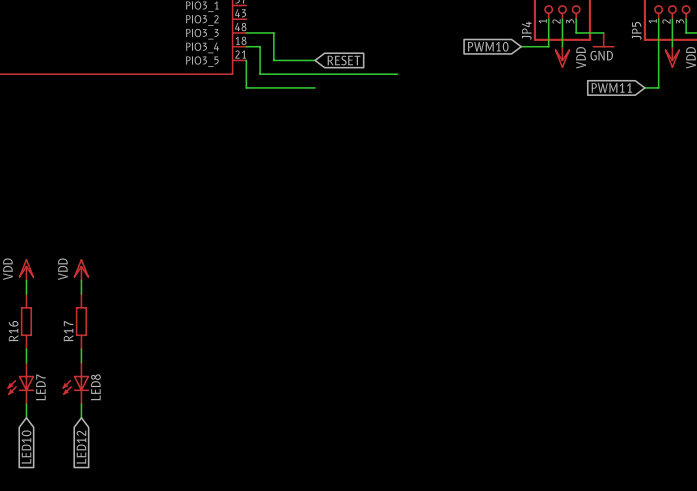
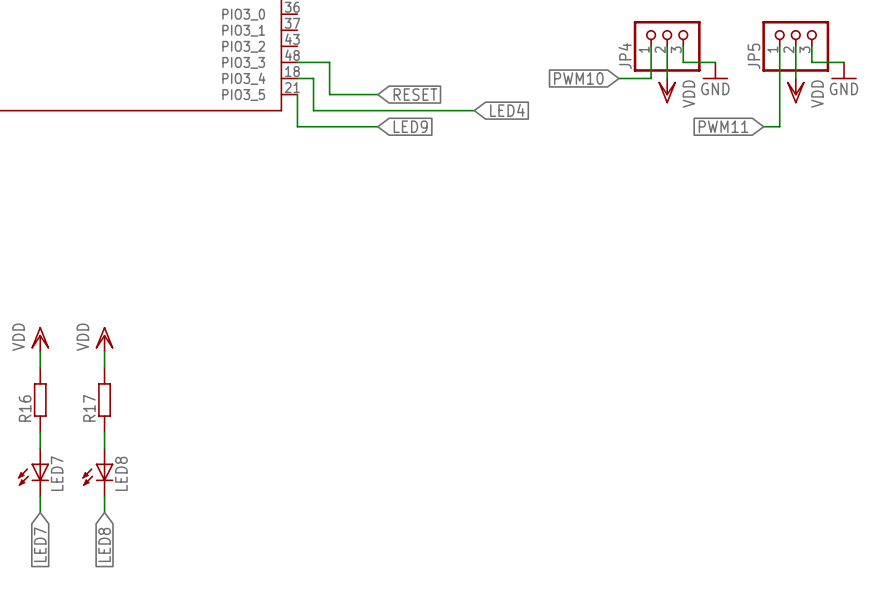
global label: none -> LED4 (507, 110)
global label: none -> LED9 (410, 126)
global label: LED10 (26, 447) -> LED7 (40, 544)
global label: LED12 (81, 447) -> LED8 (104, 544)

